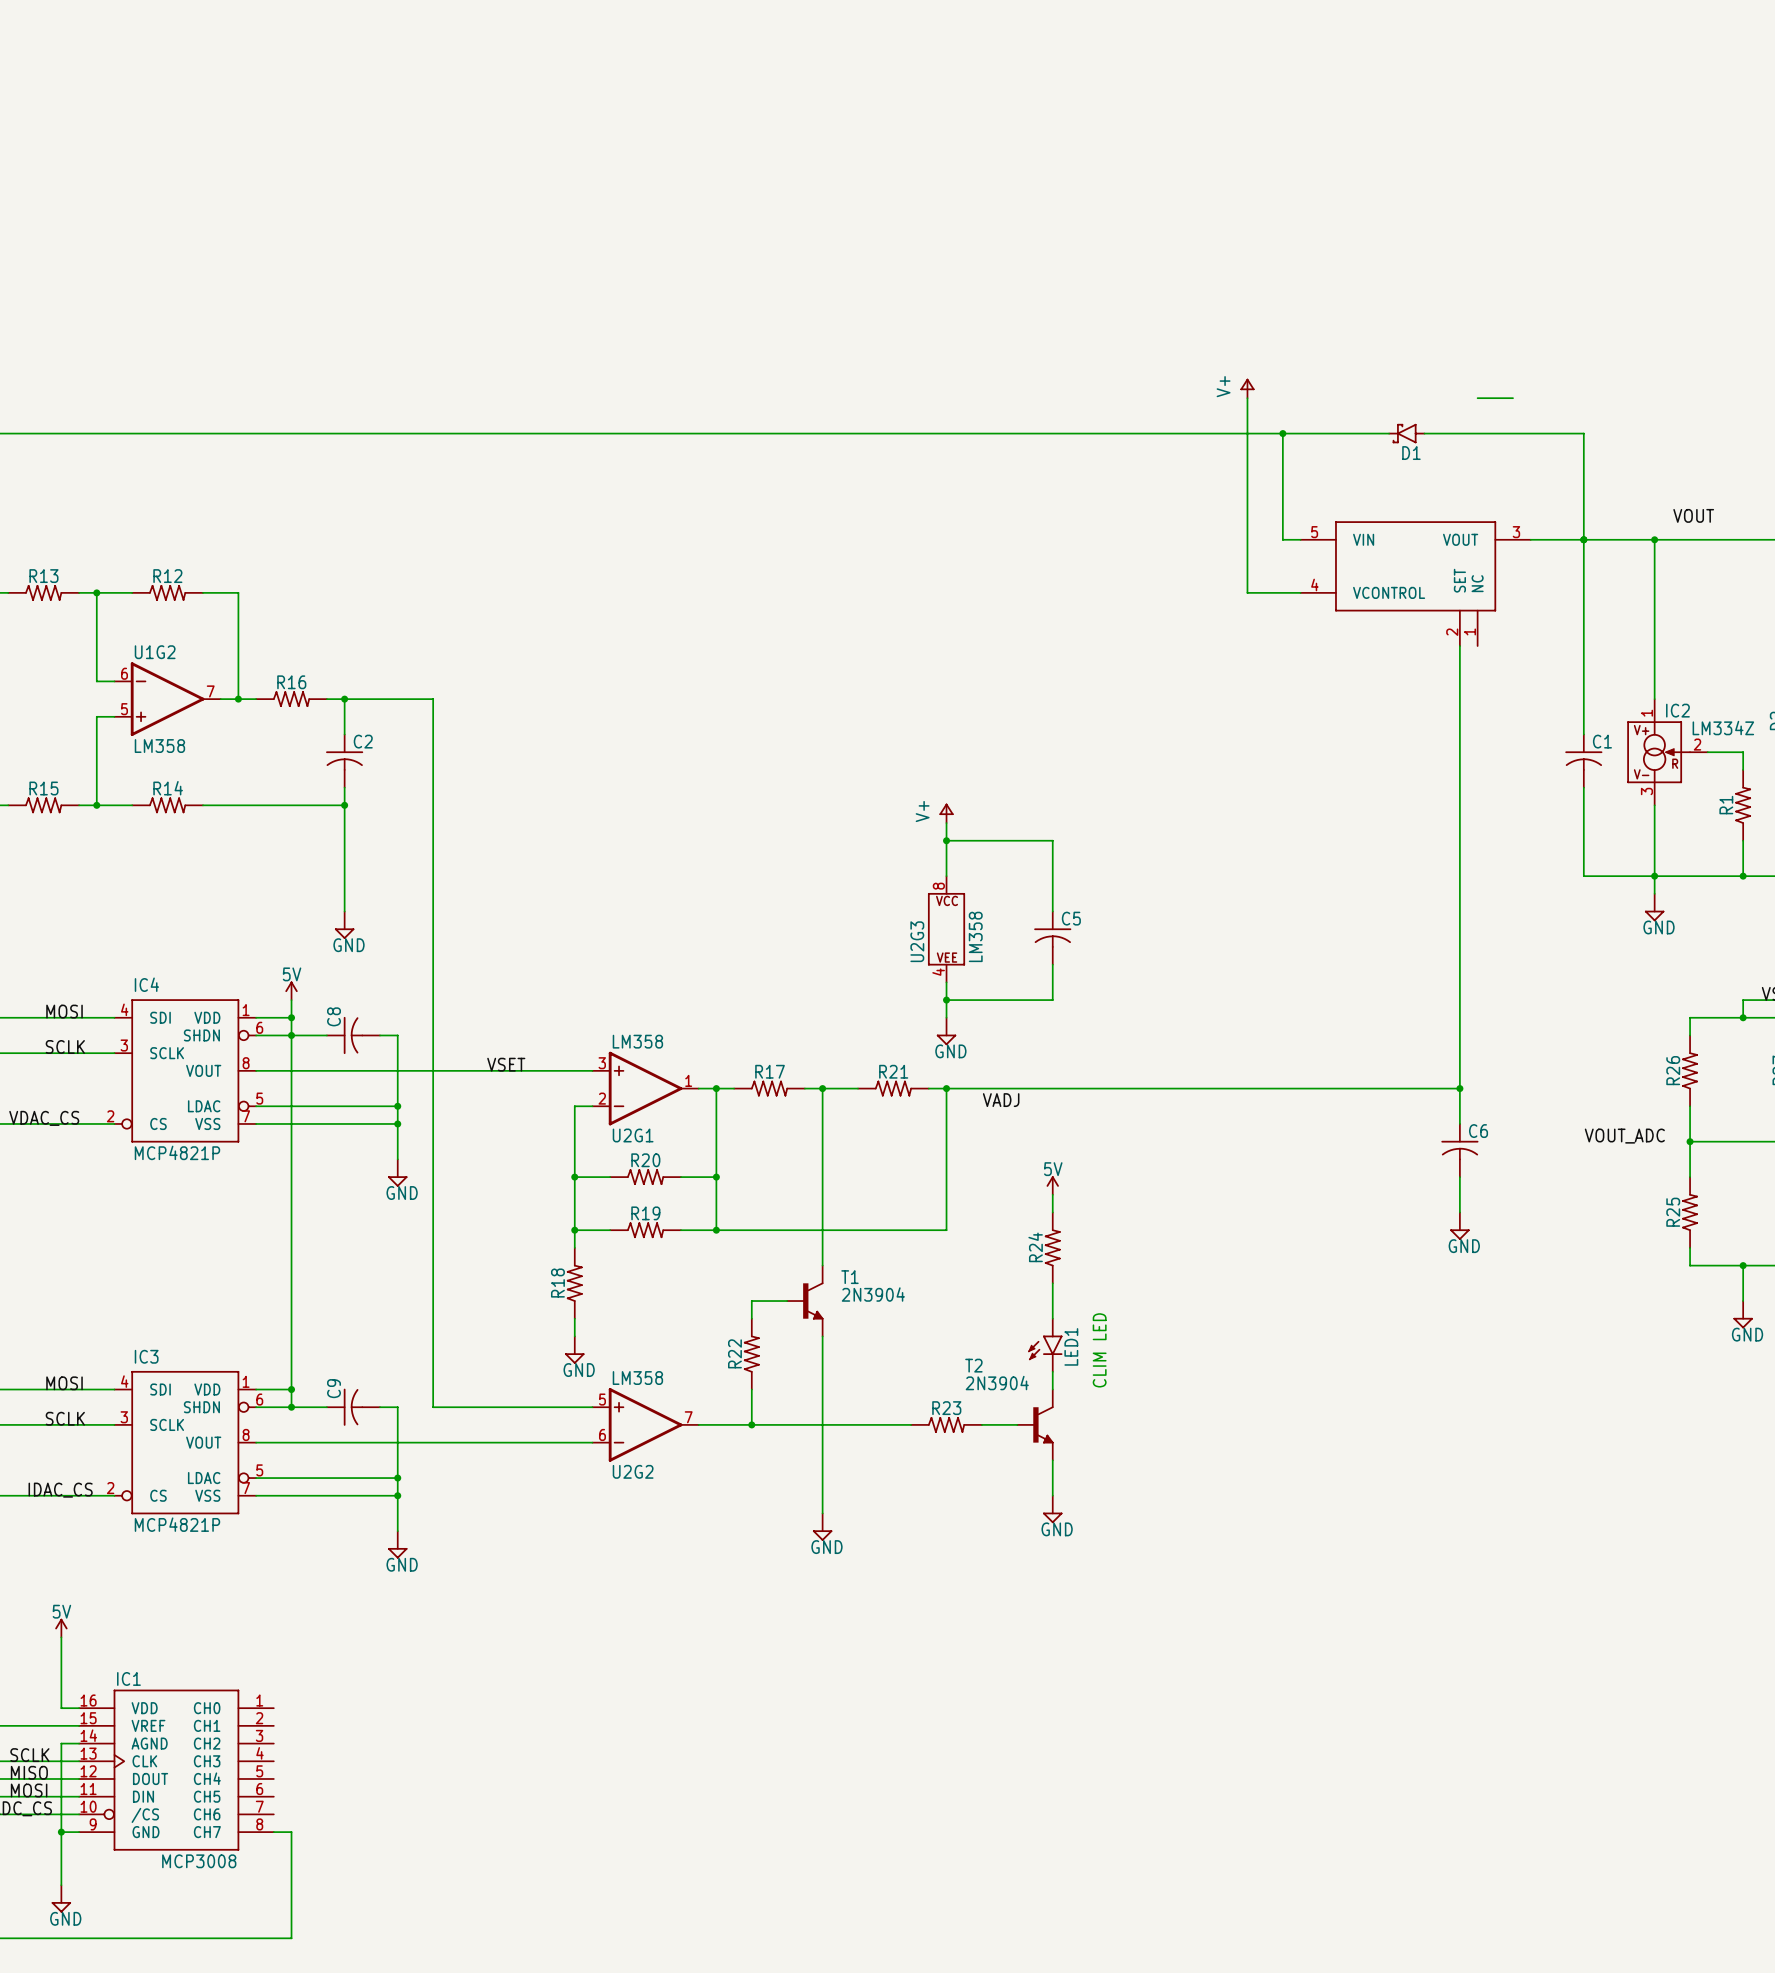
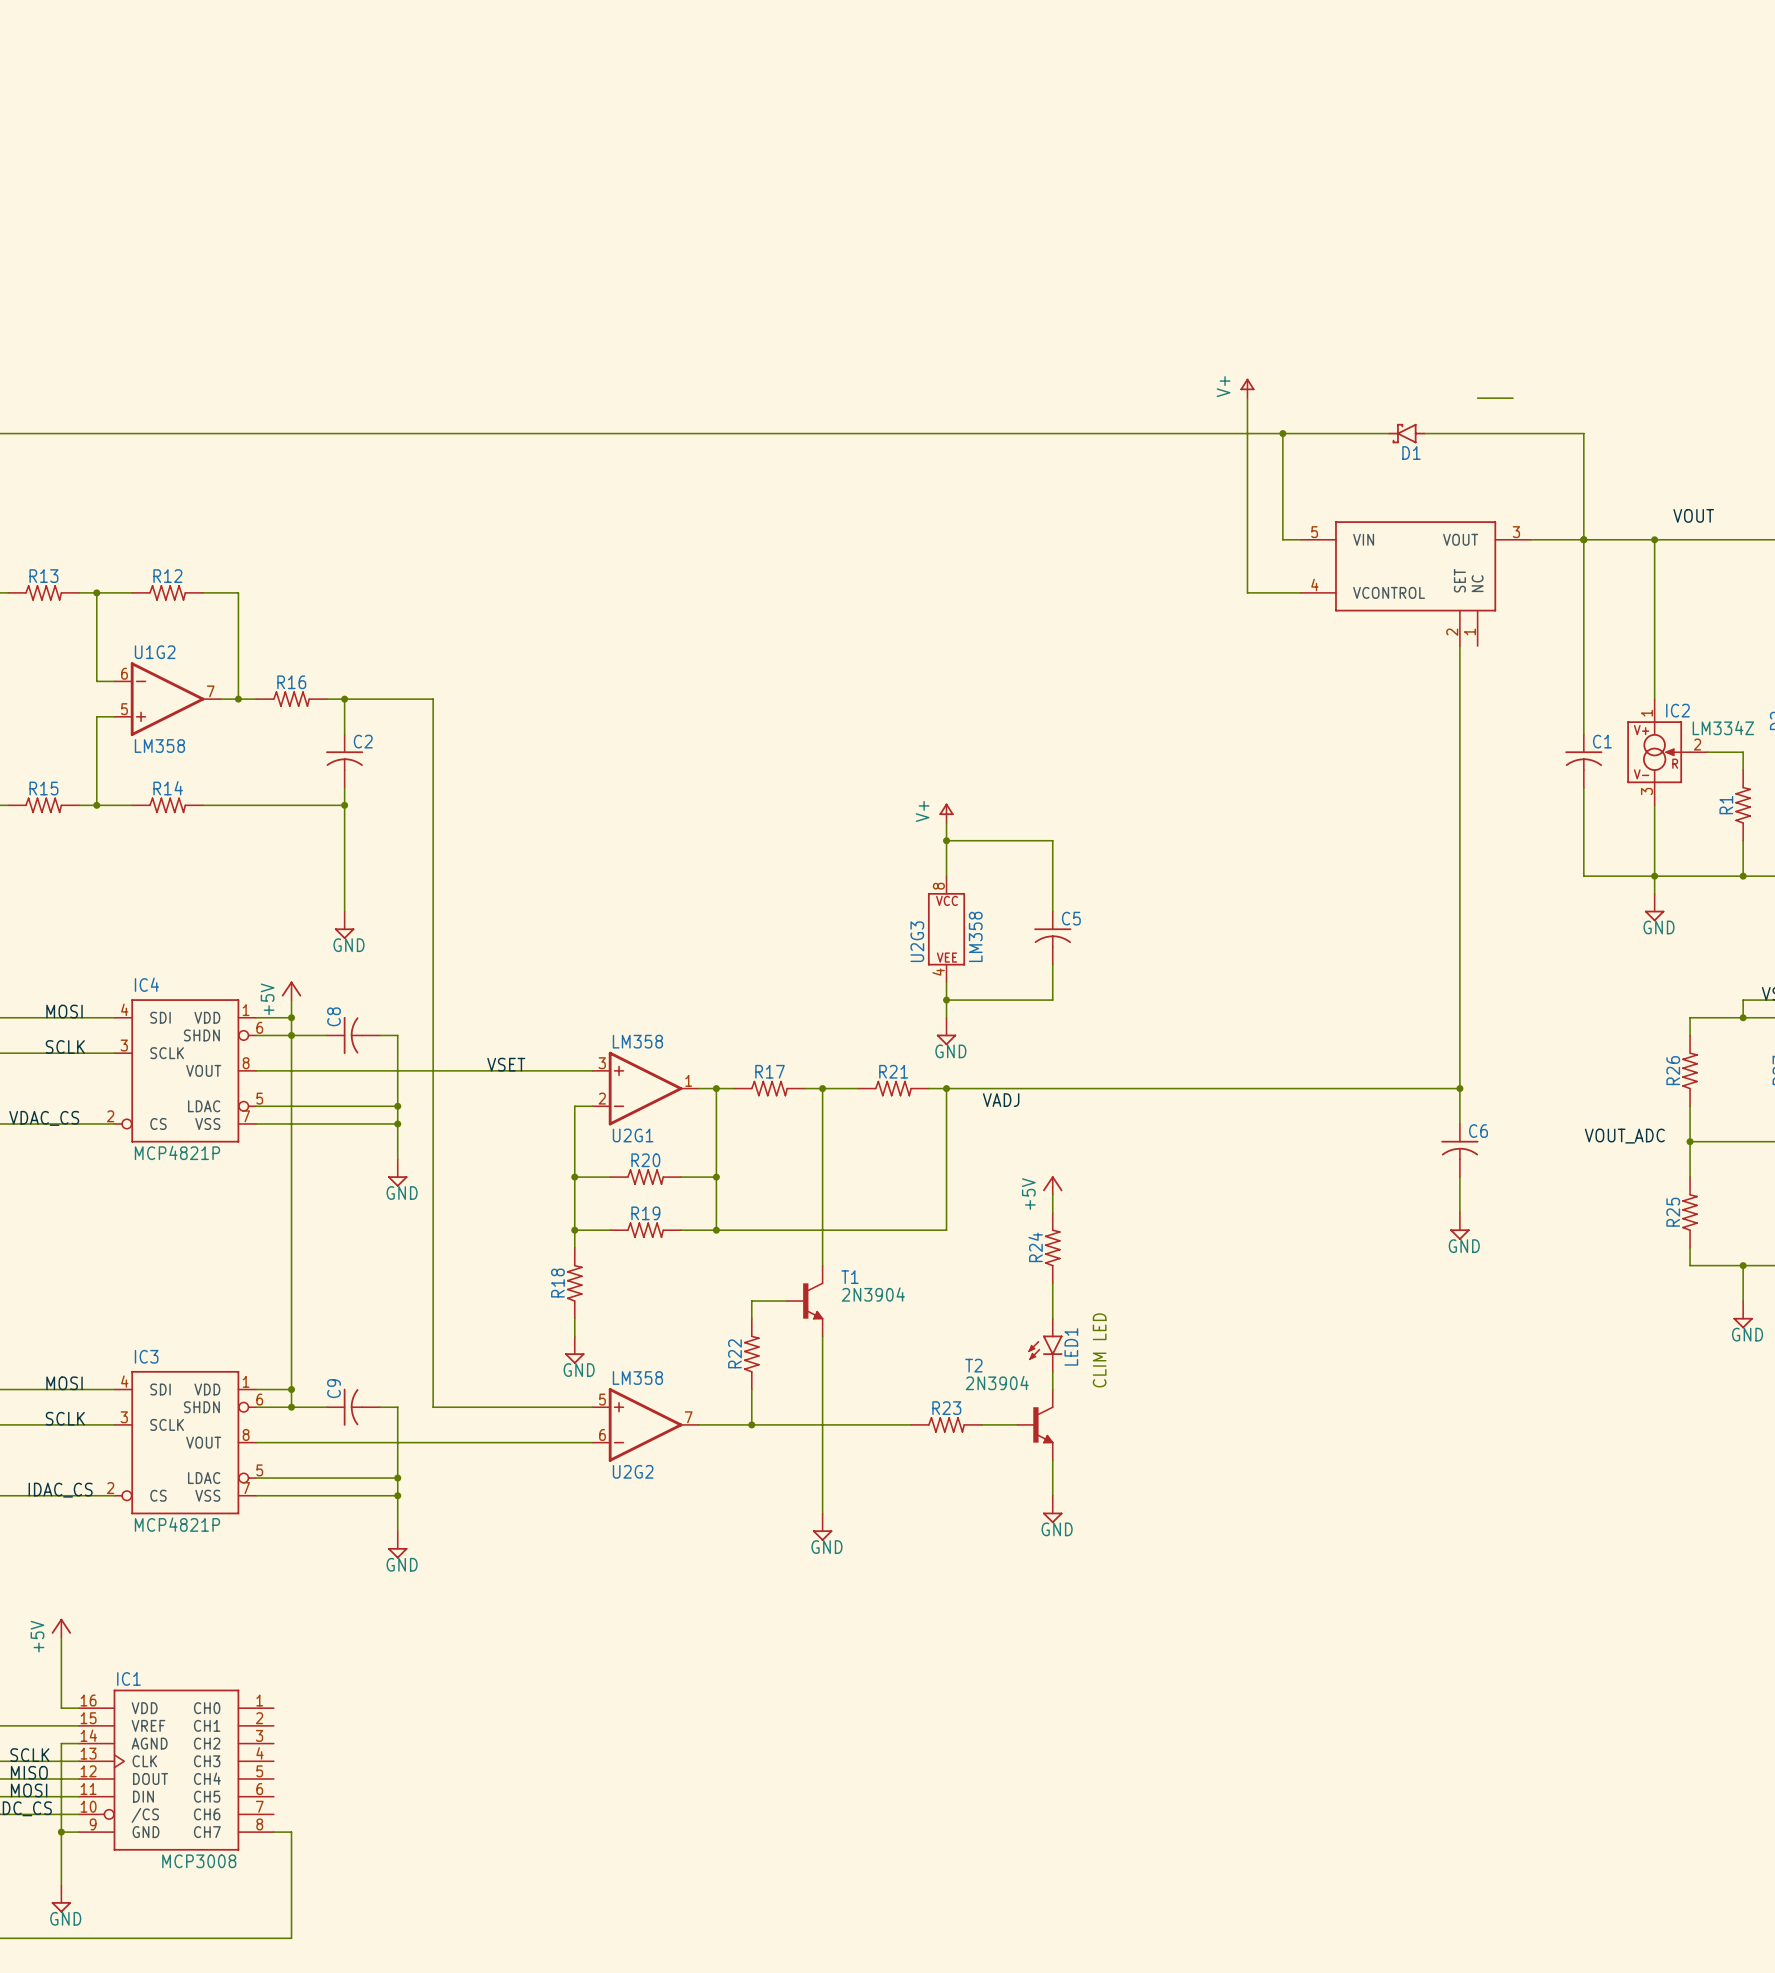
power symbol: 5V (291, 990) -> +5V (291, 990)
power symbol: 5V (1052, 1185) -> +5V (1052, 1185)
power symbol: 5V (61, 1628) -> +5V (61, 1628)

